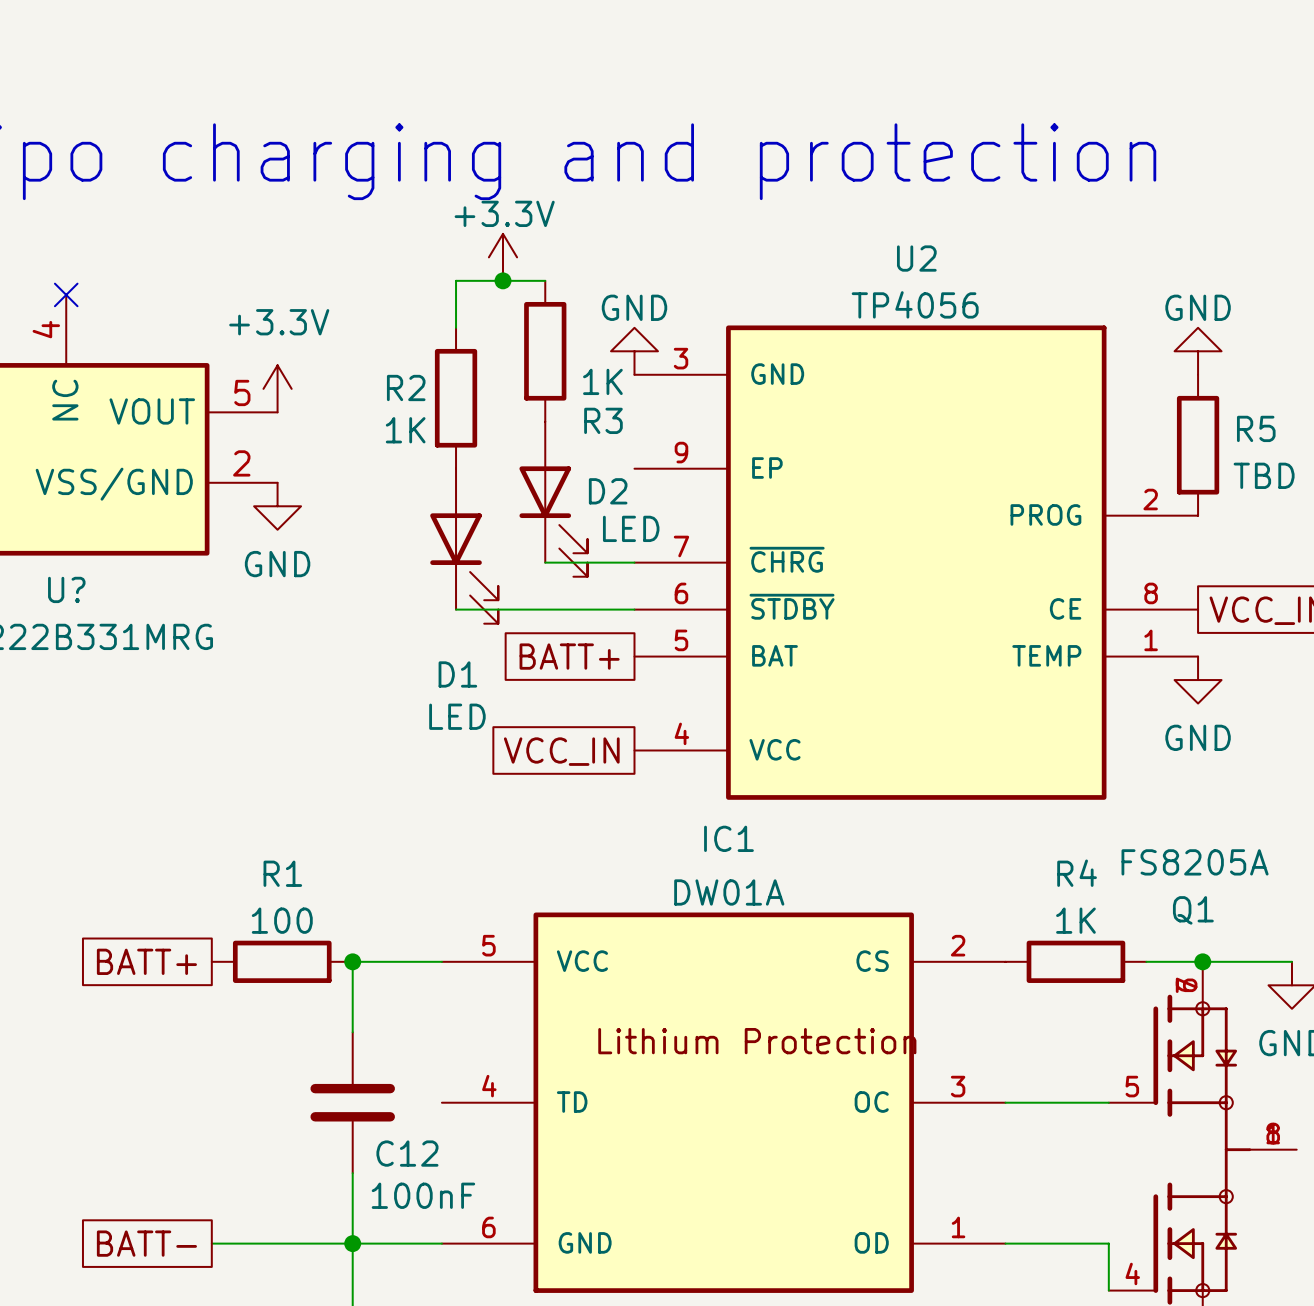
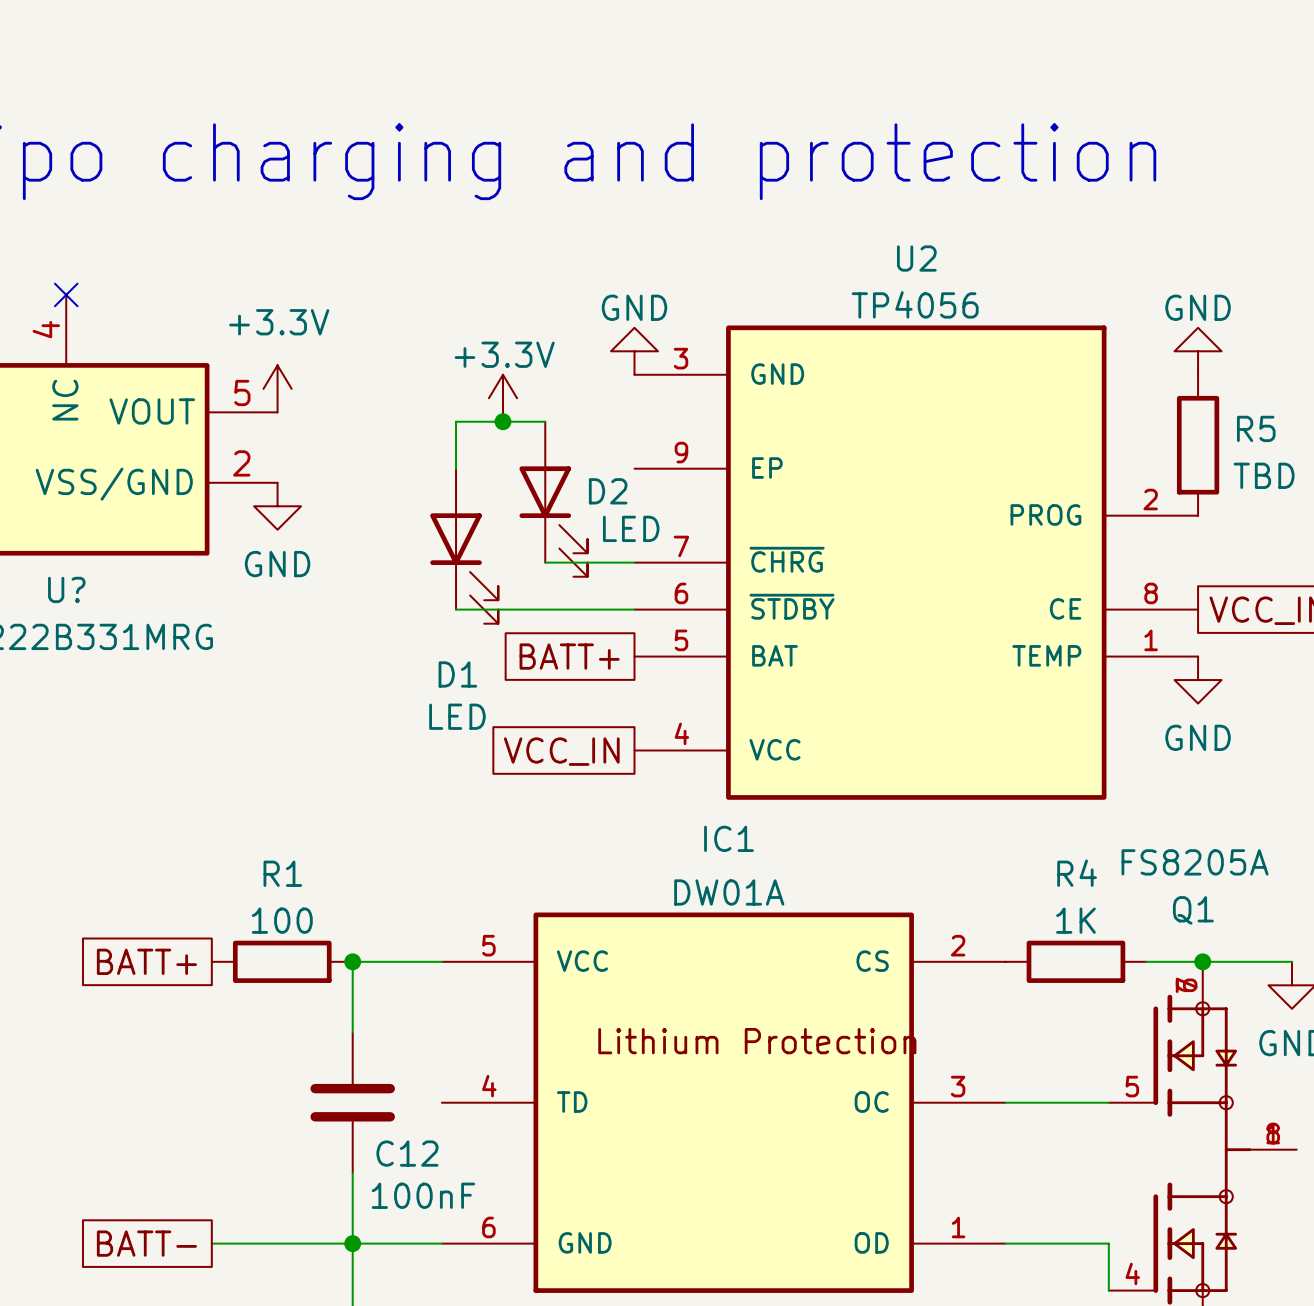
power symbol position: +3.3V (502, 257) -> +3.3V (502, 398)
junction: (502, 280) -> none
wire: (545, 280) (456, 280) (456, 327) -> (545, 421) (456, 421) (456, 468)
R3: 1K (545, 351) -> none
R2: 1K (456, 398) -> none
junction: none -> (502, 421)

